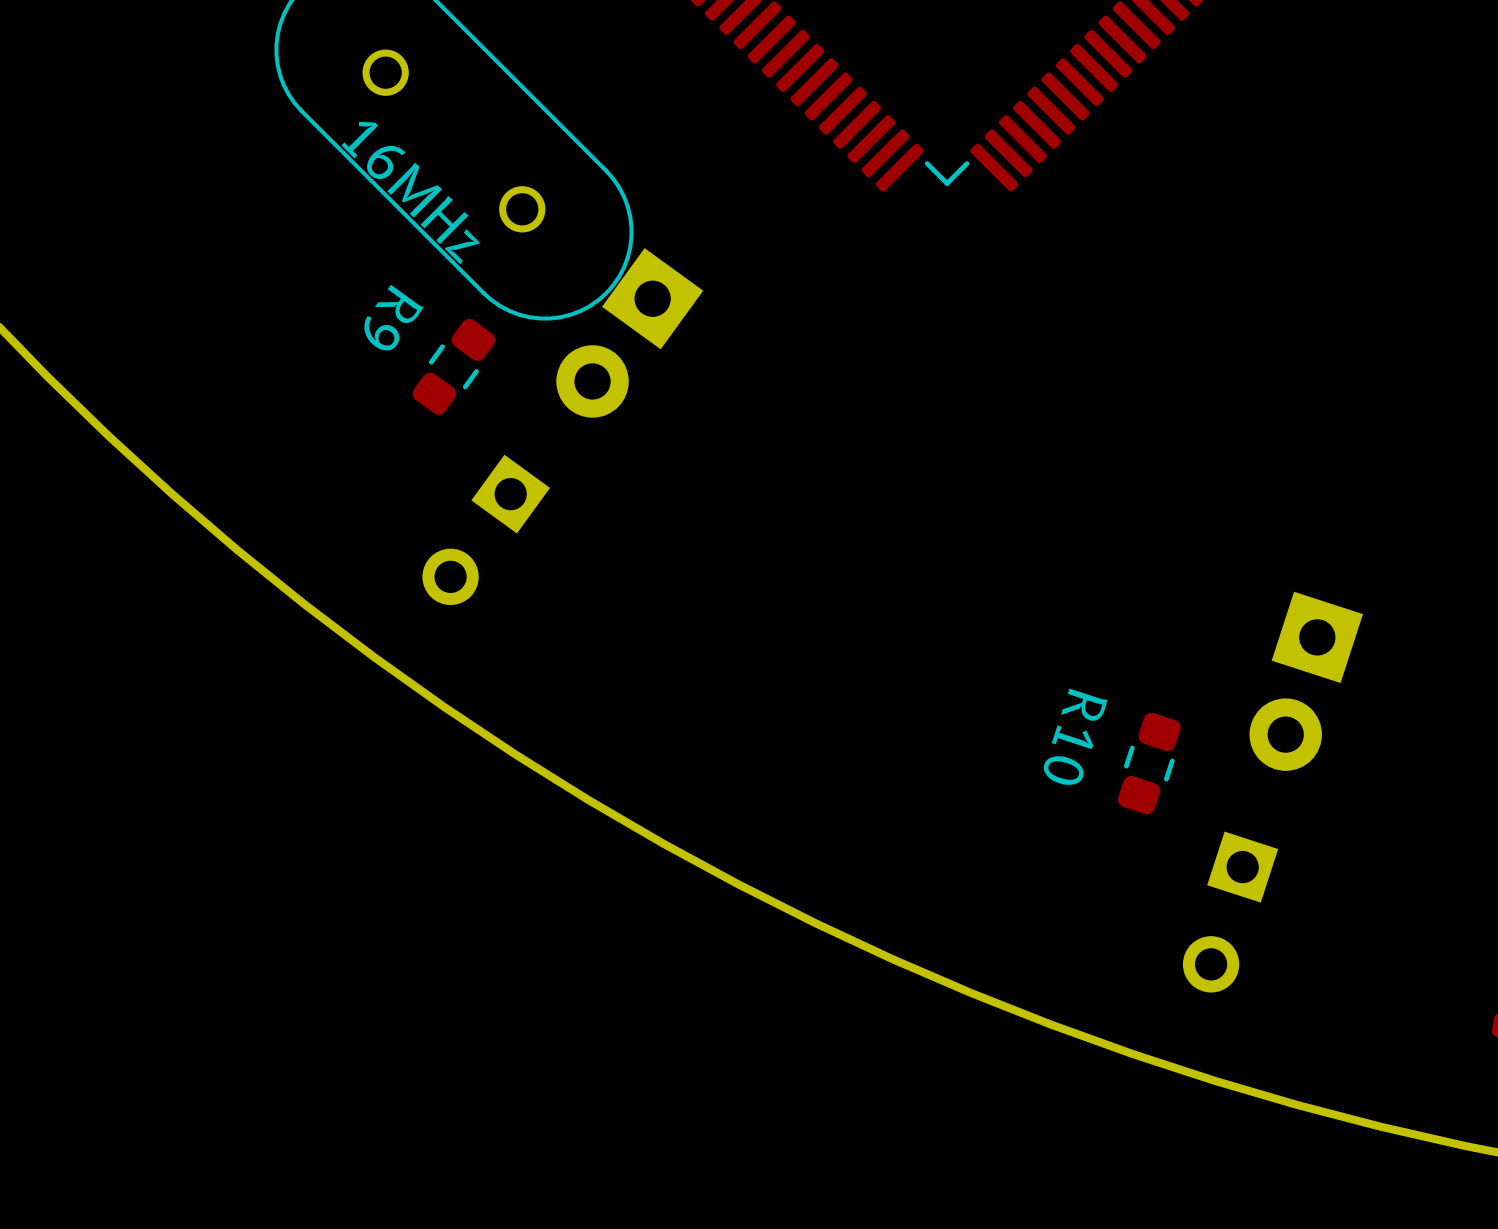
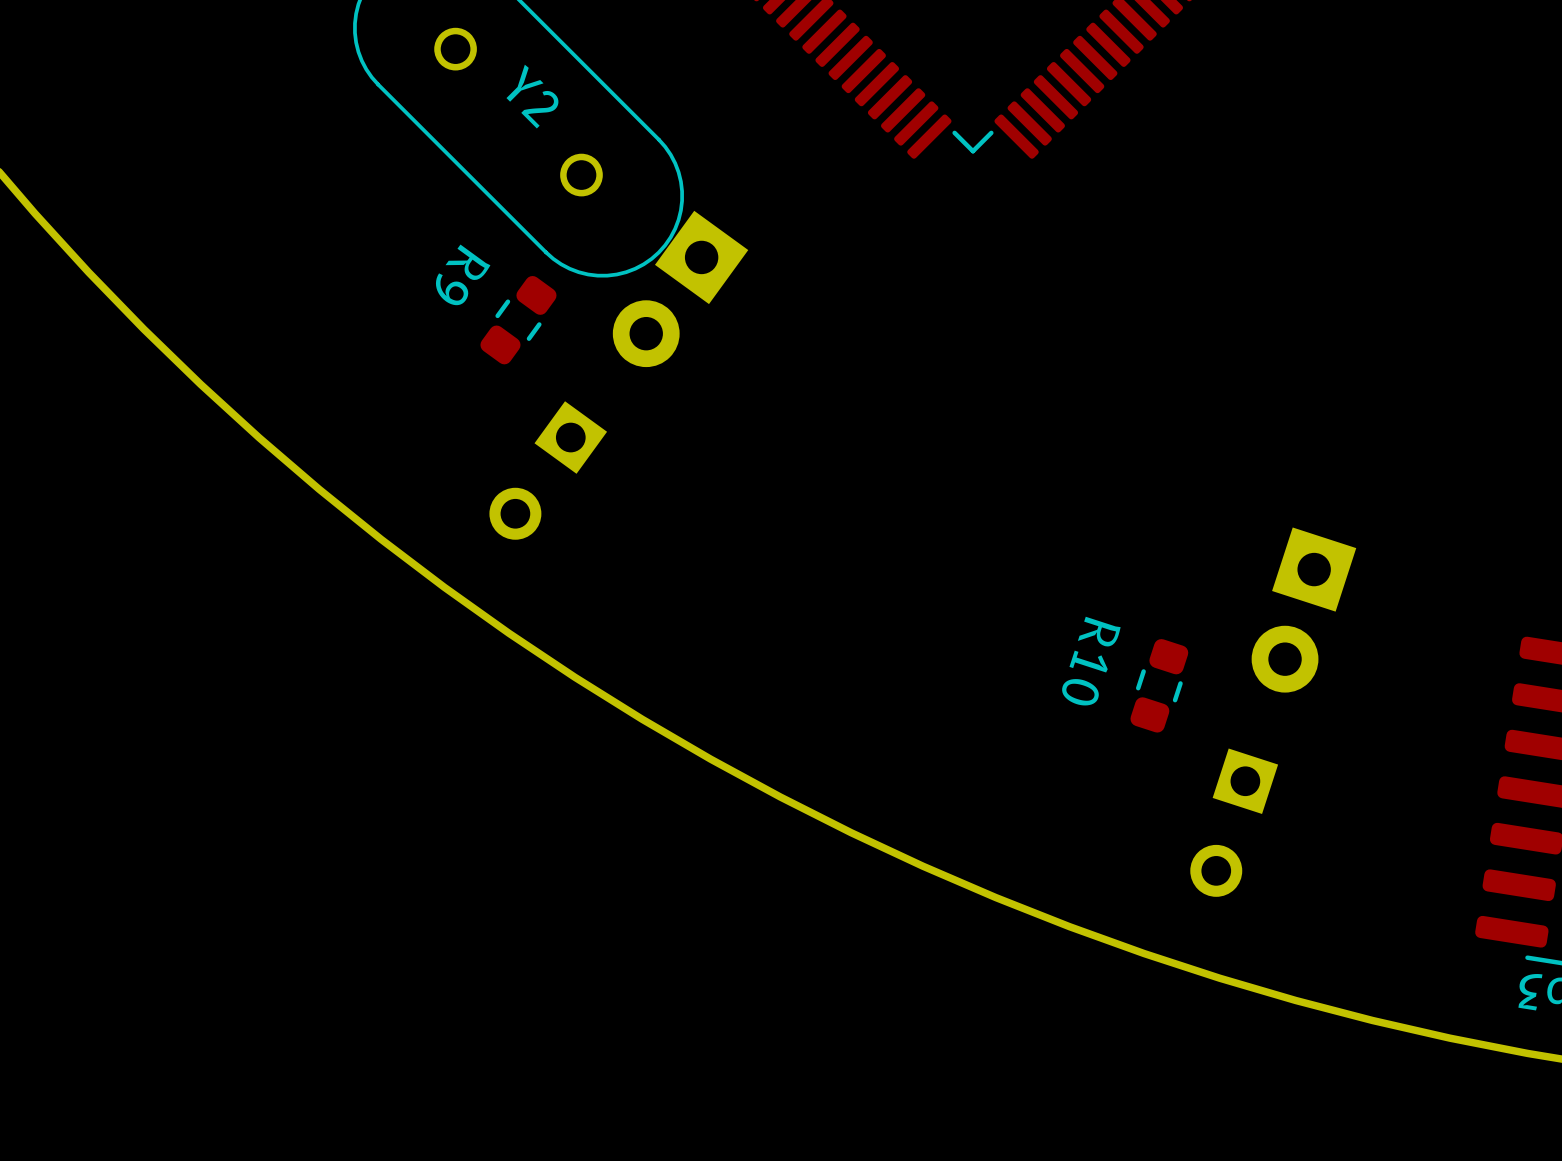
16MHz name: 16MHz (410, 193) -> Y2 (532, 96)

